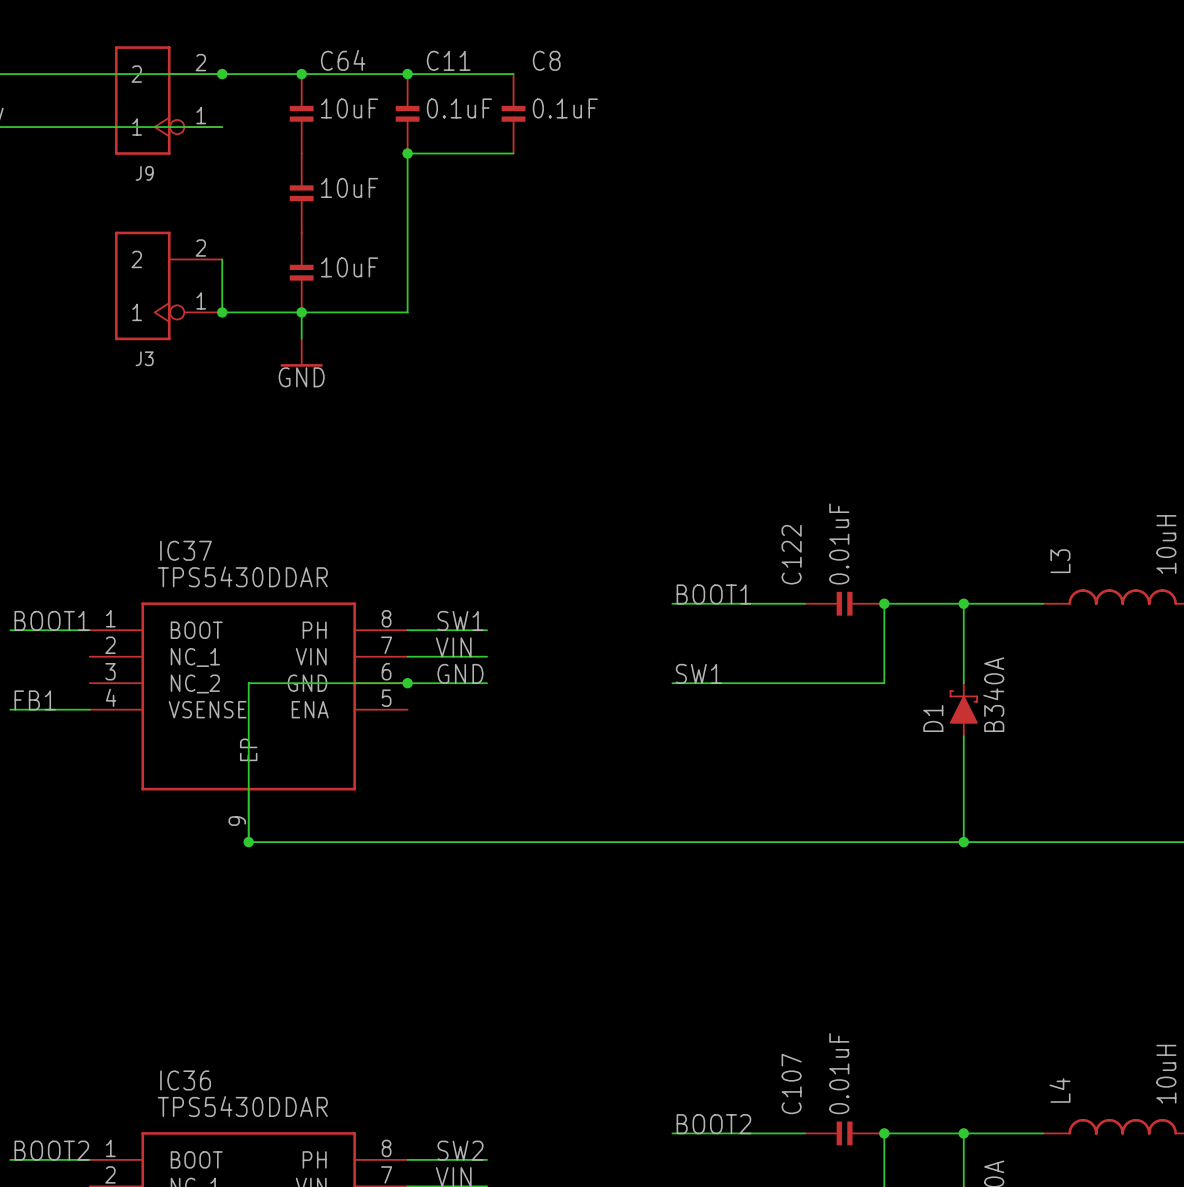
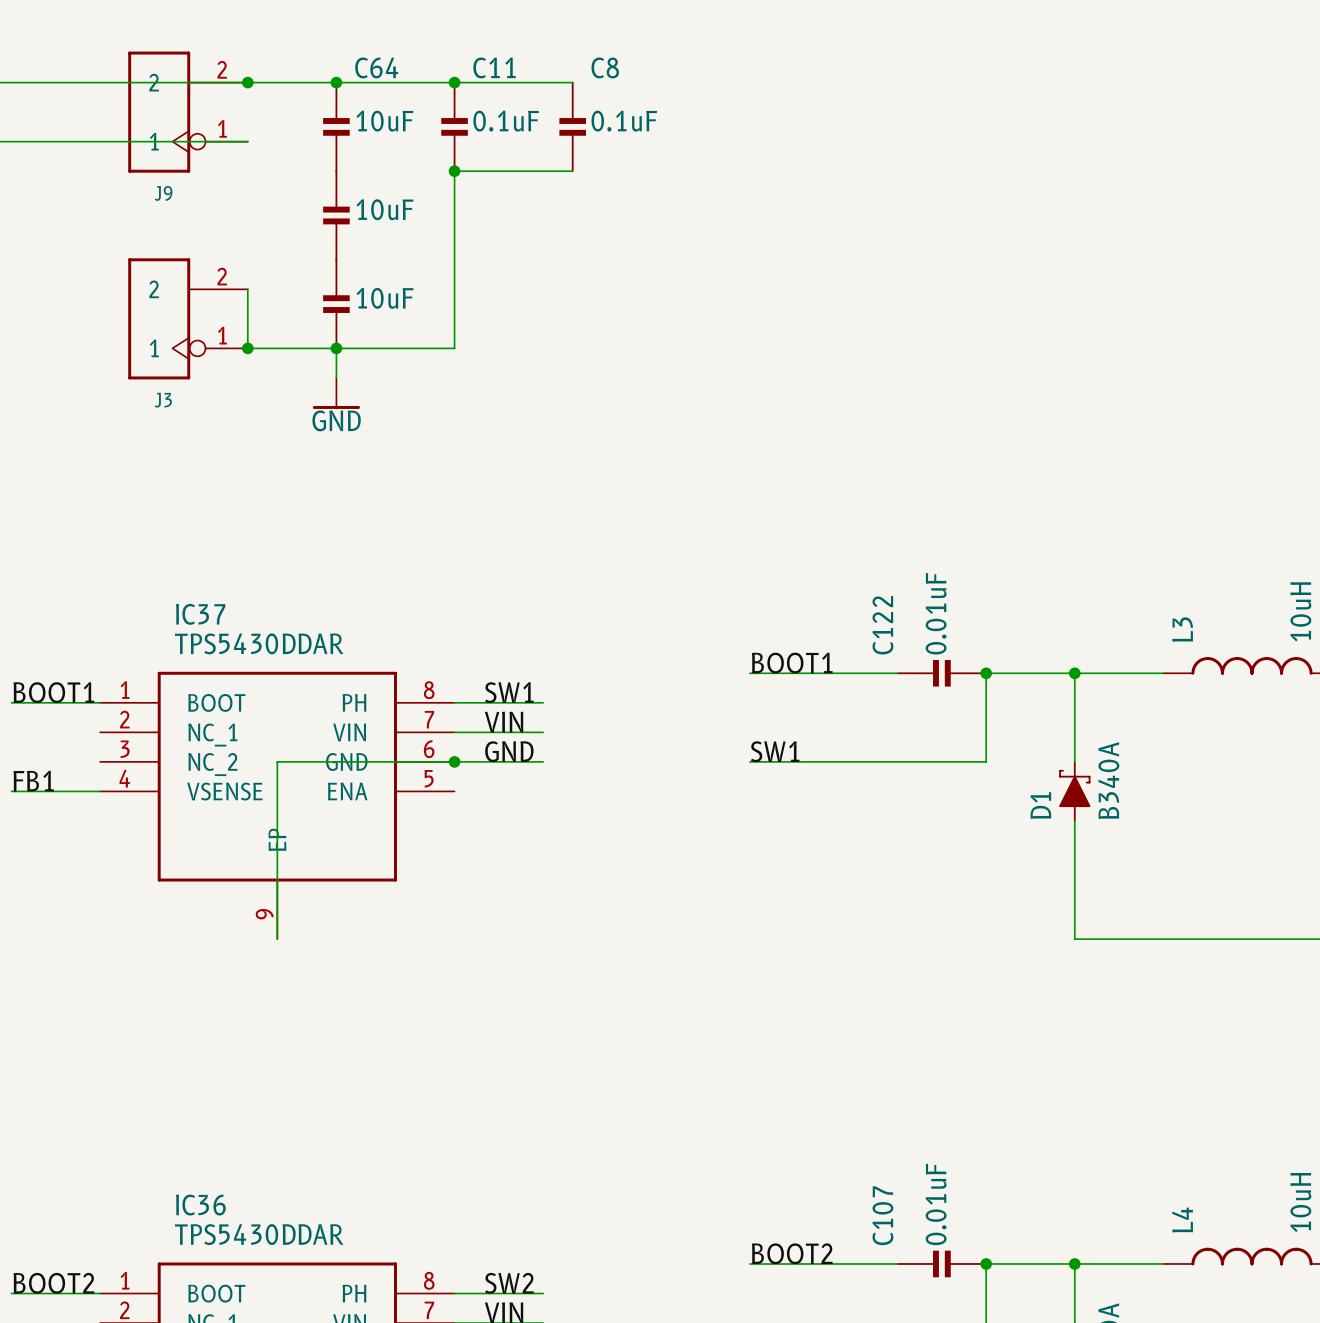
wire: (248, 842) (963, 842) -> none
junction: (248, 842) -> none
junction: (963, 842) -> none

